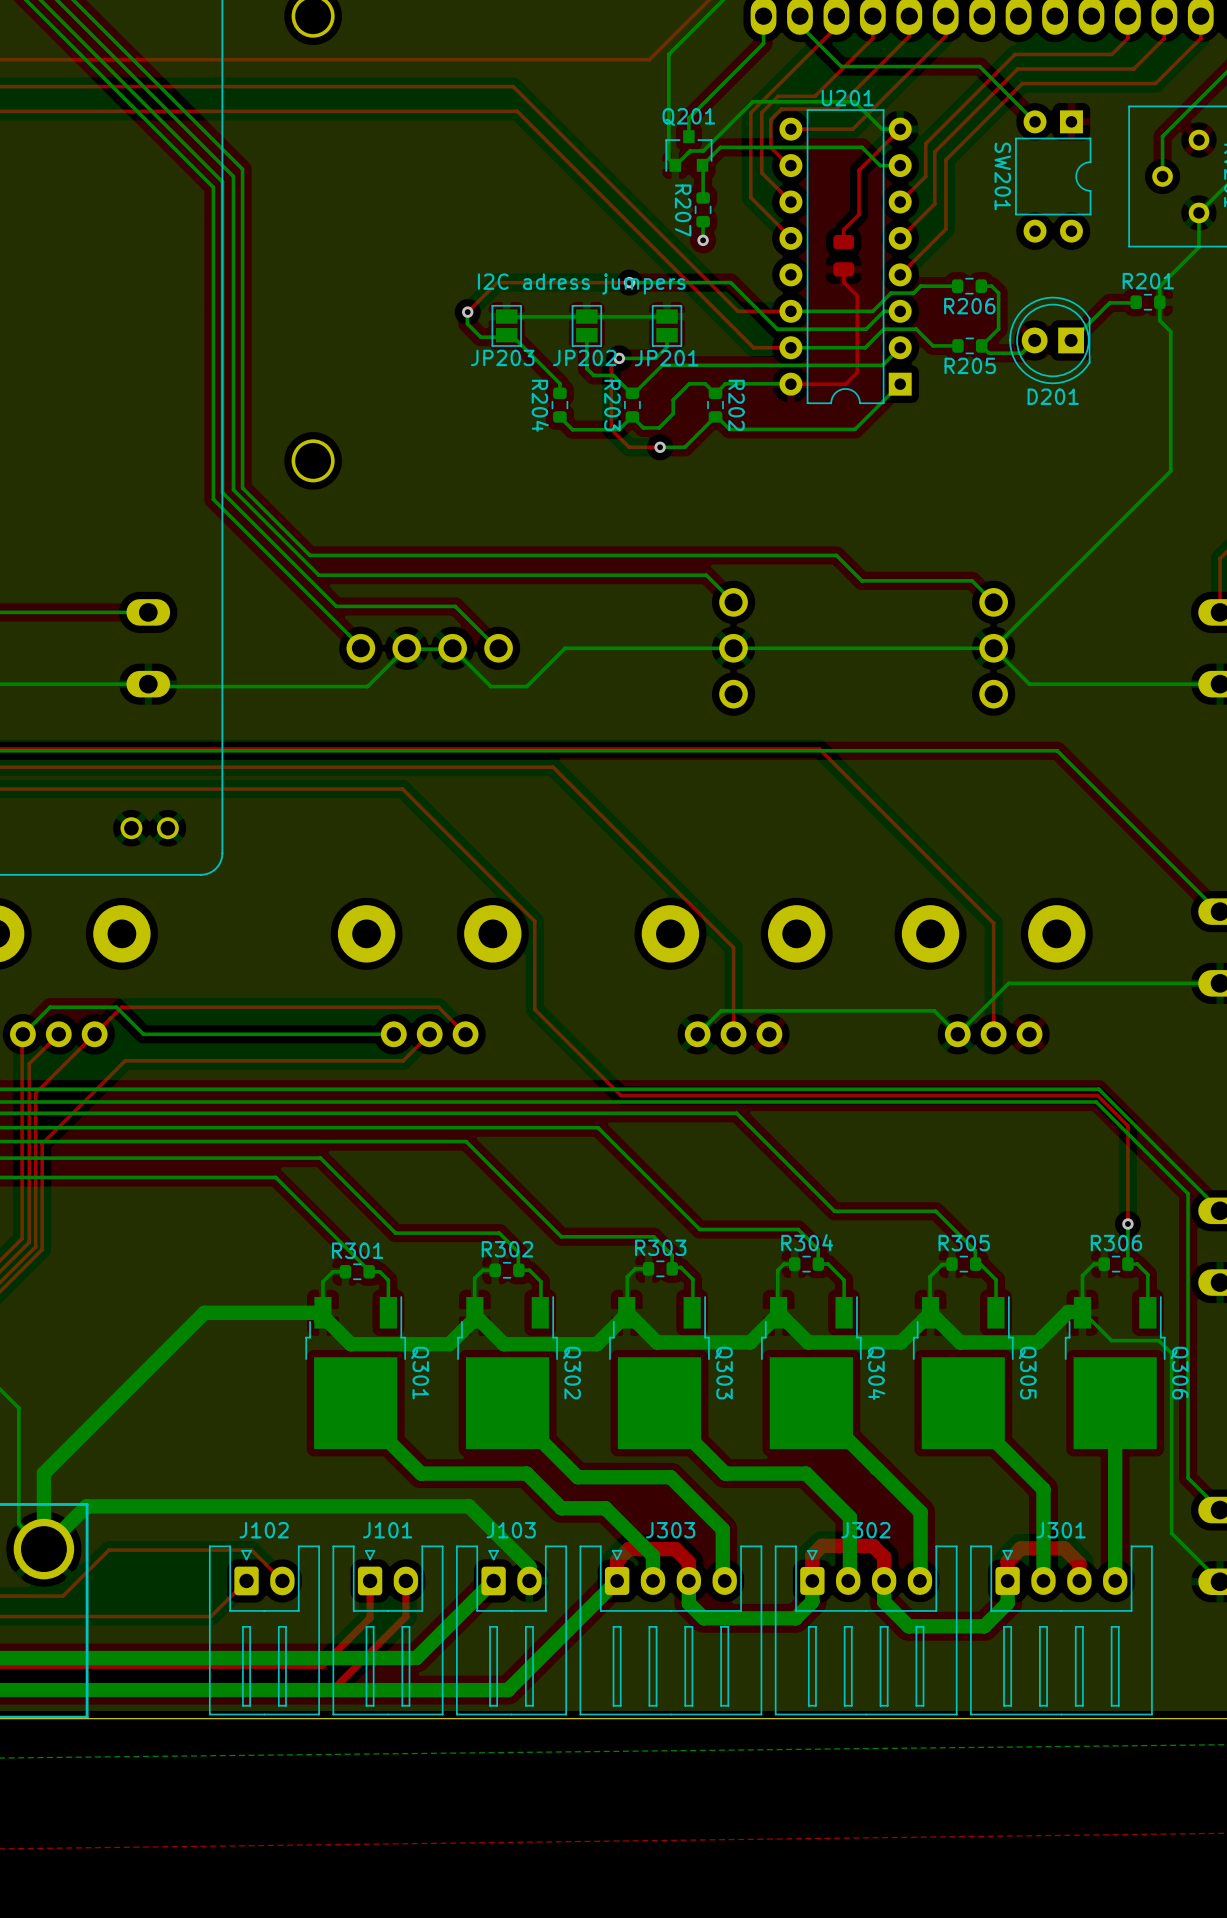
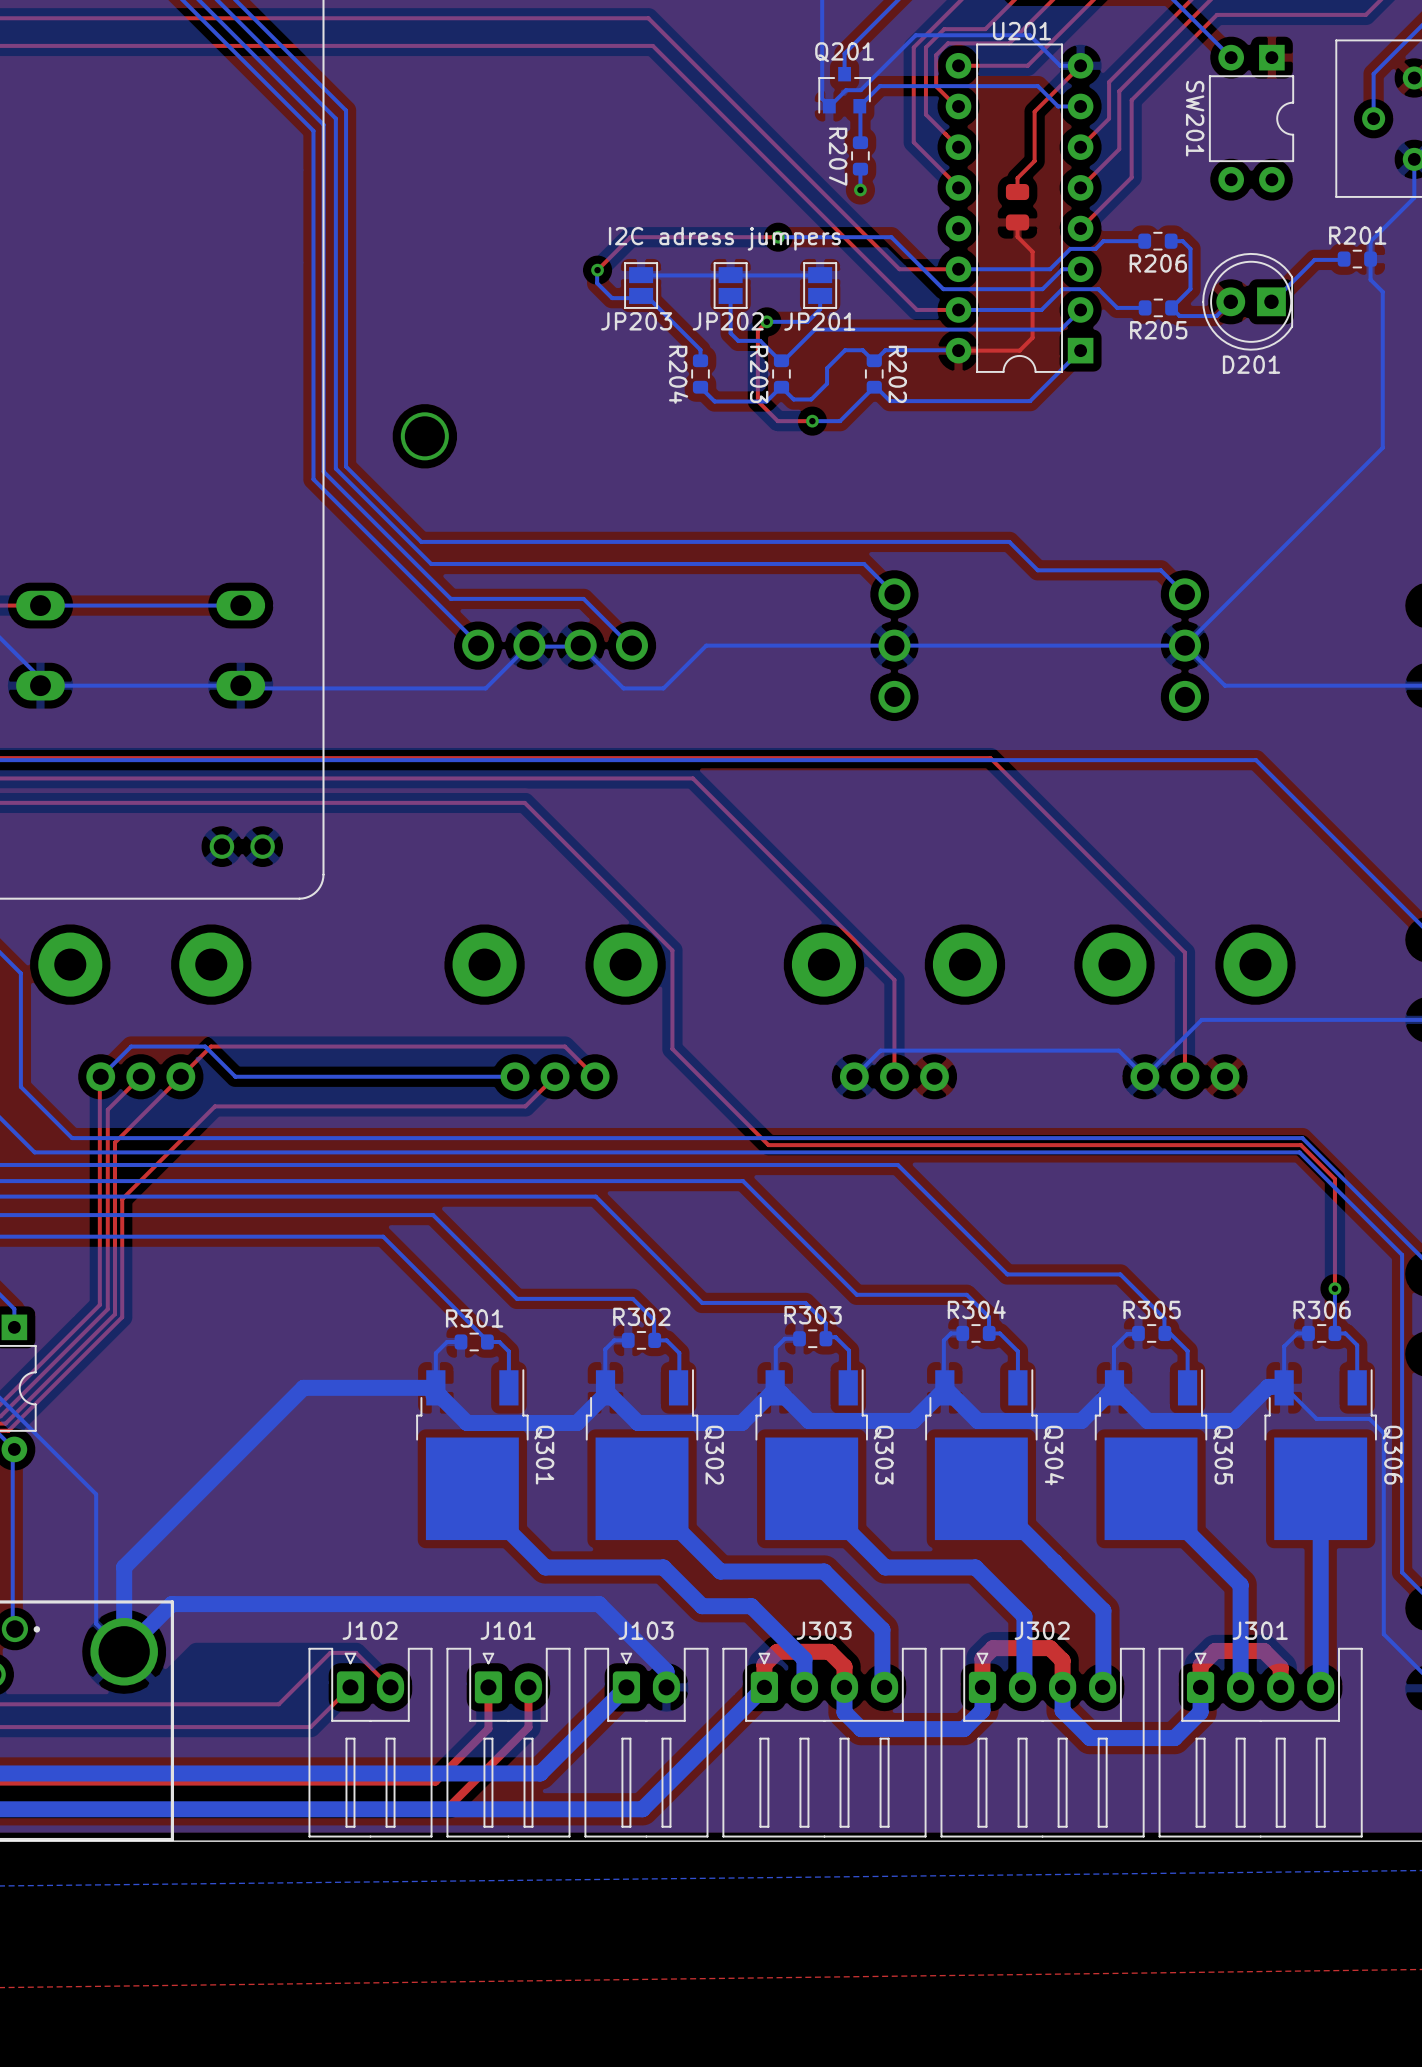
top track: (228, 1550) (108, 1550) (62, 1596) -> (330, 1652) (278, 1704) (145, 1704)

